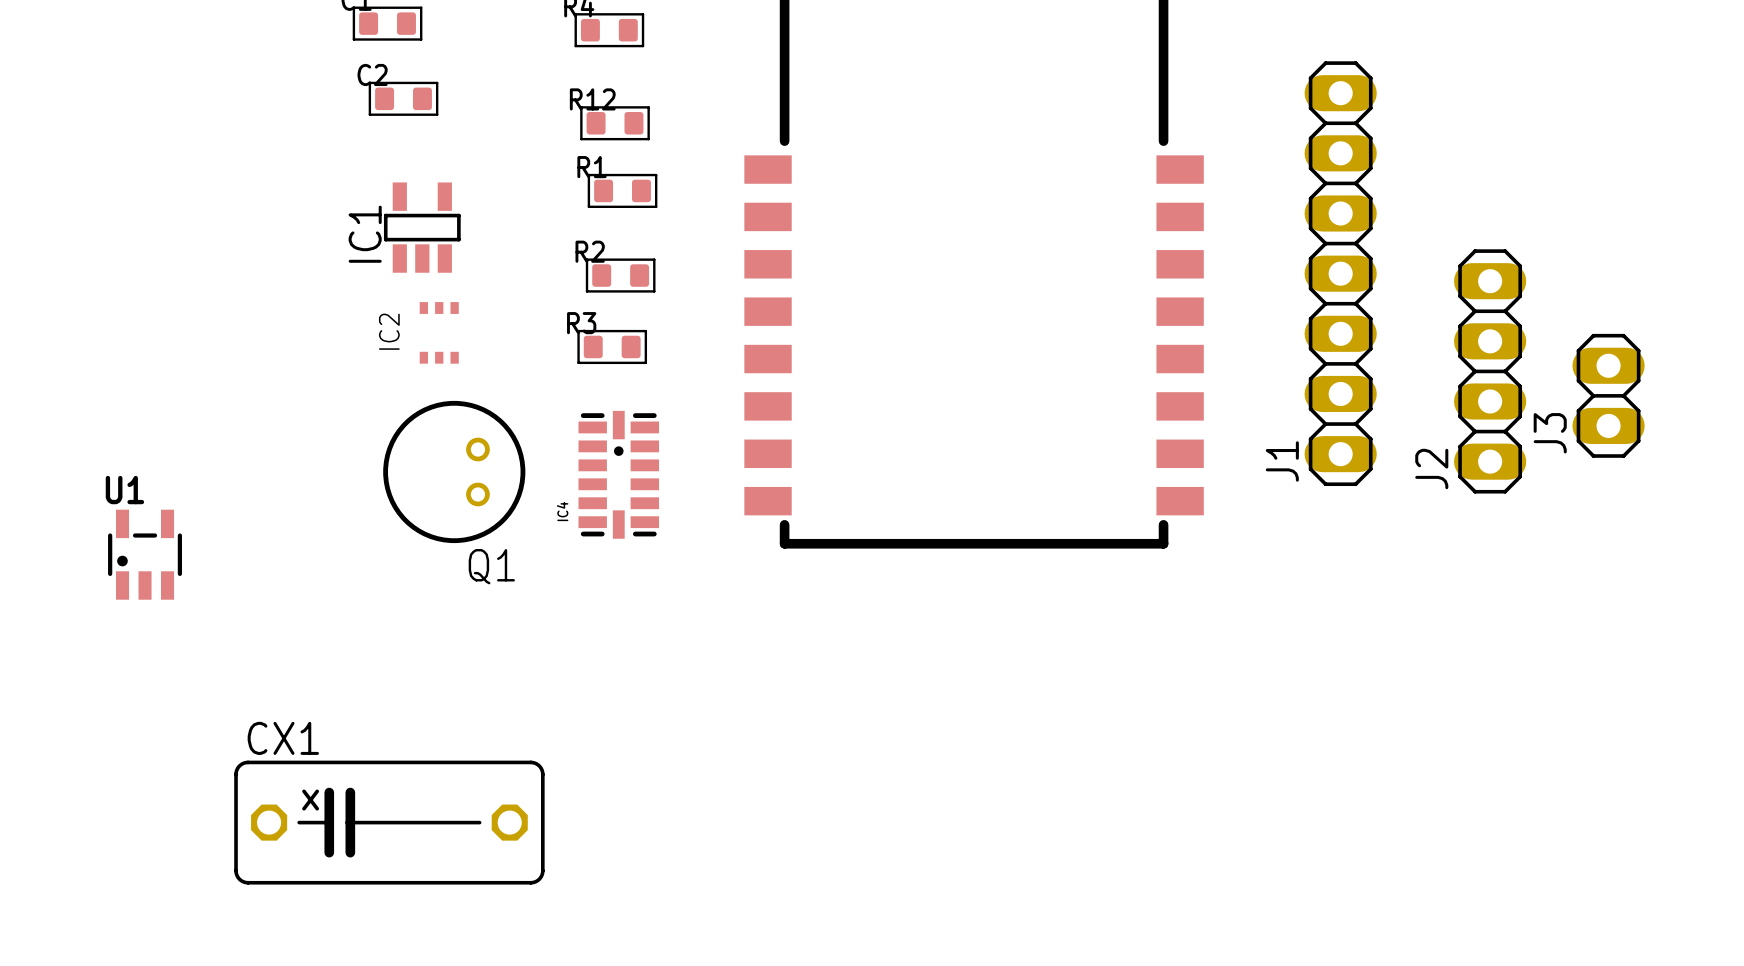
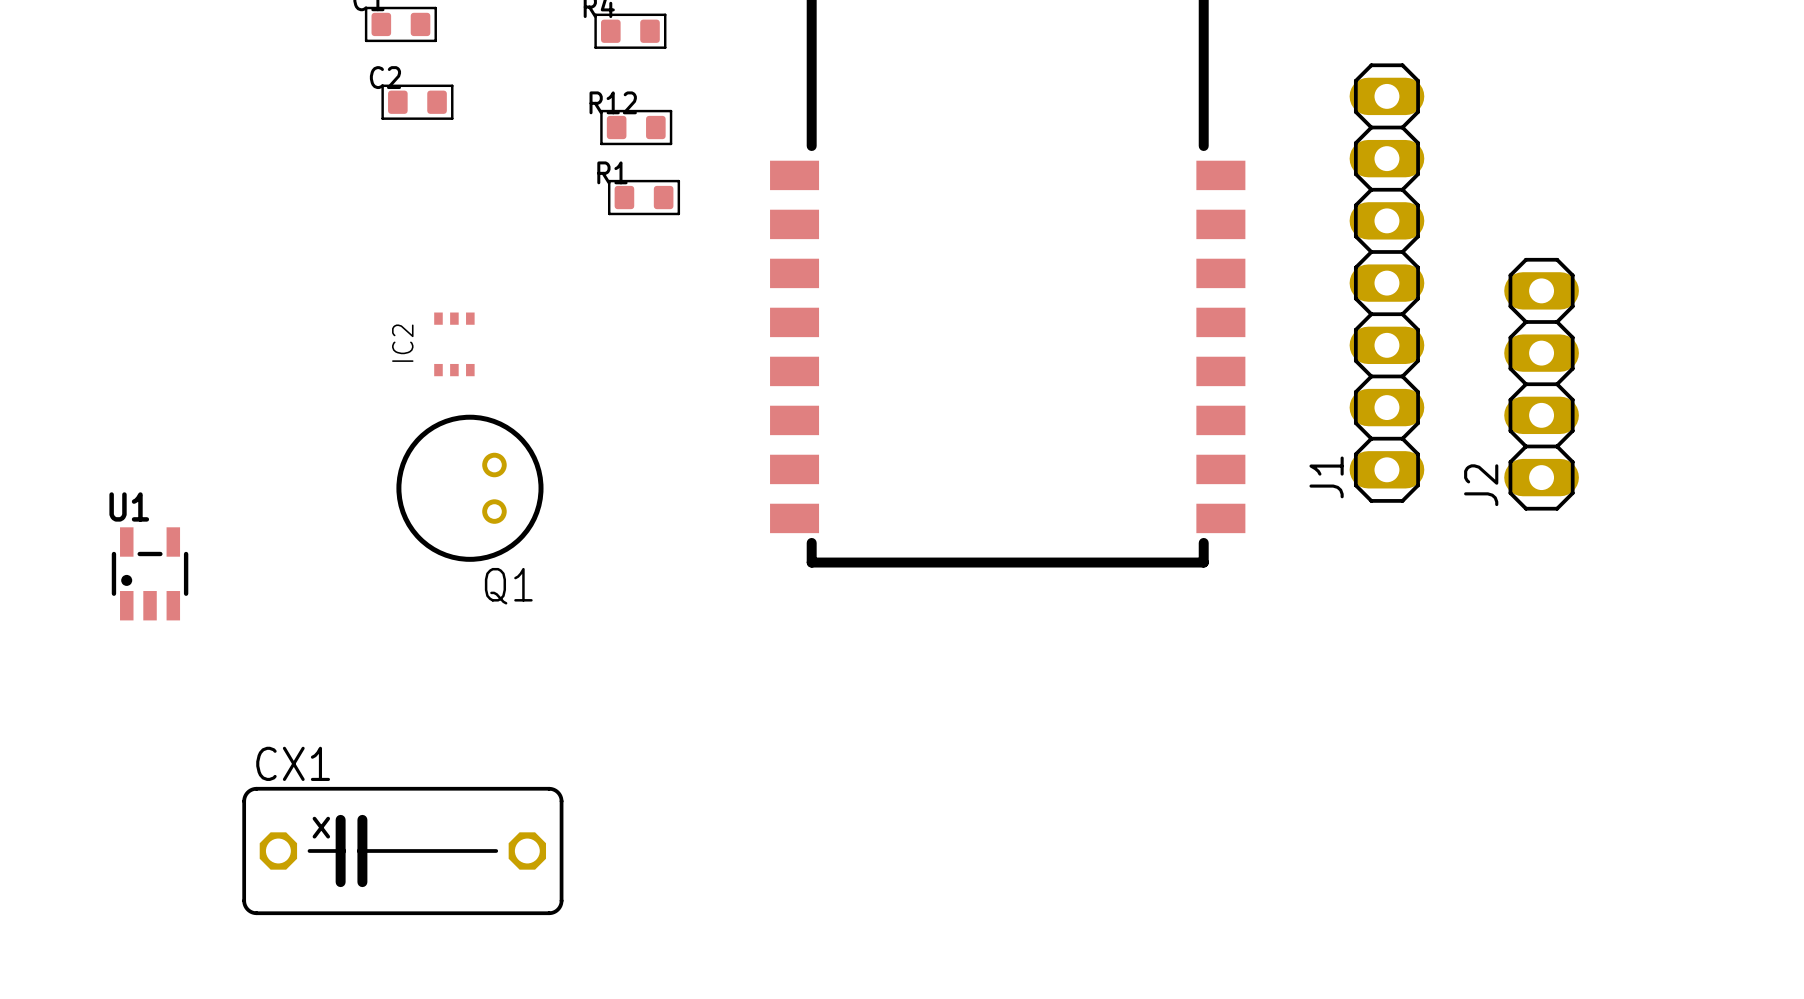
IC1: (422, 227) -> none
R2: (620, 275) -> none
R3: (612, 346) -> none
J3: (1608, 395) -> none
IC4: (618, 474) -> none

